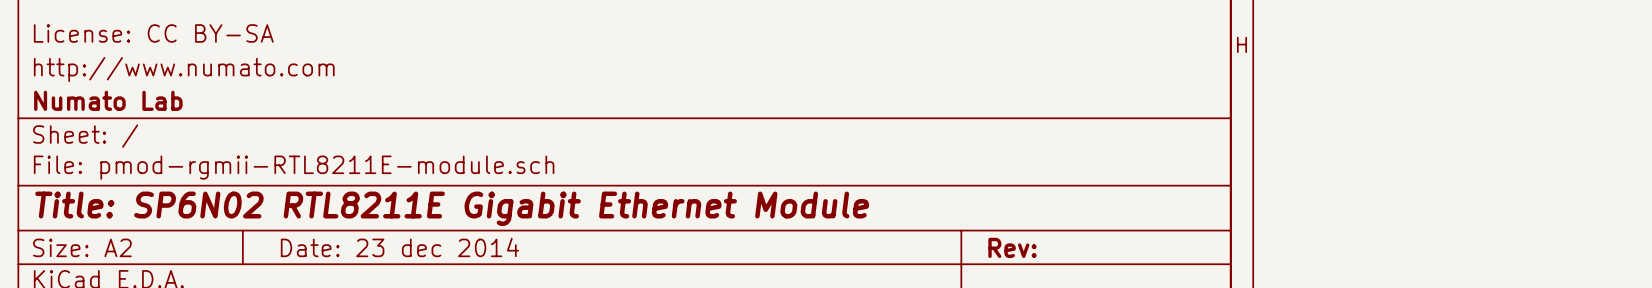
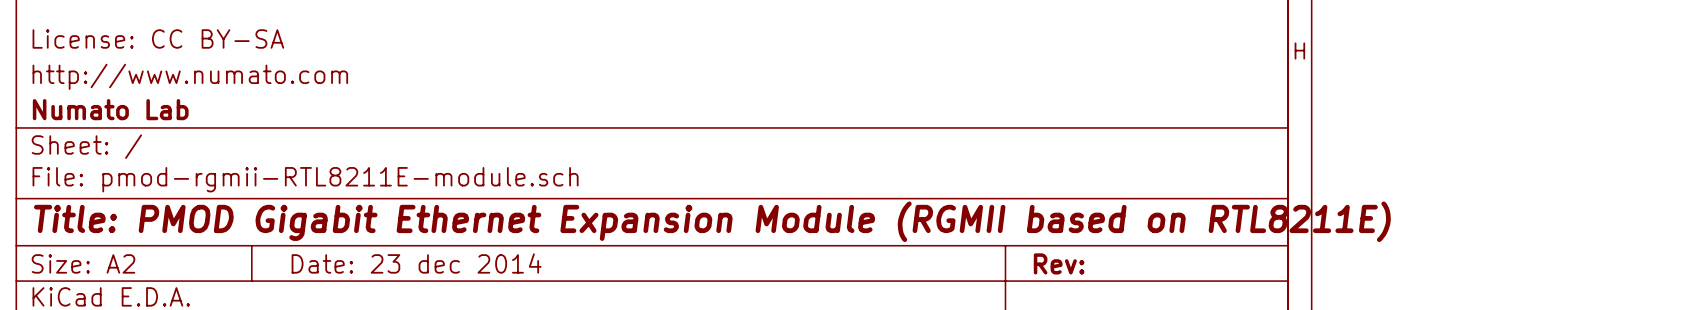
title block: Title: SP6N02 RTL8211E Gigabit Ethernet Module (452, 208) -> Title: PMOD Gigabit Ethernet Expansion Module (RGMII based on RTL8211E) (712, 221)

